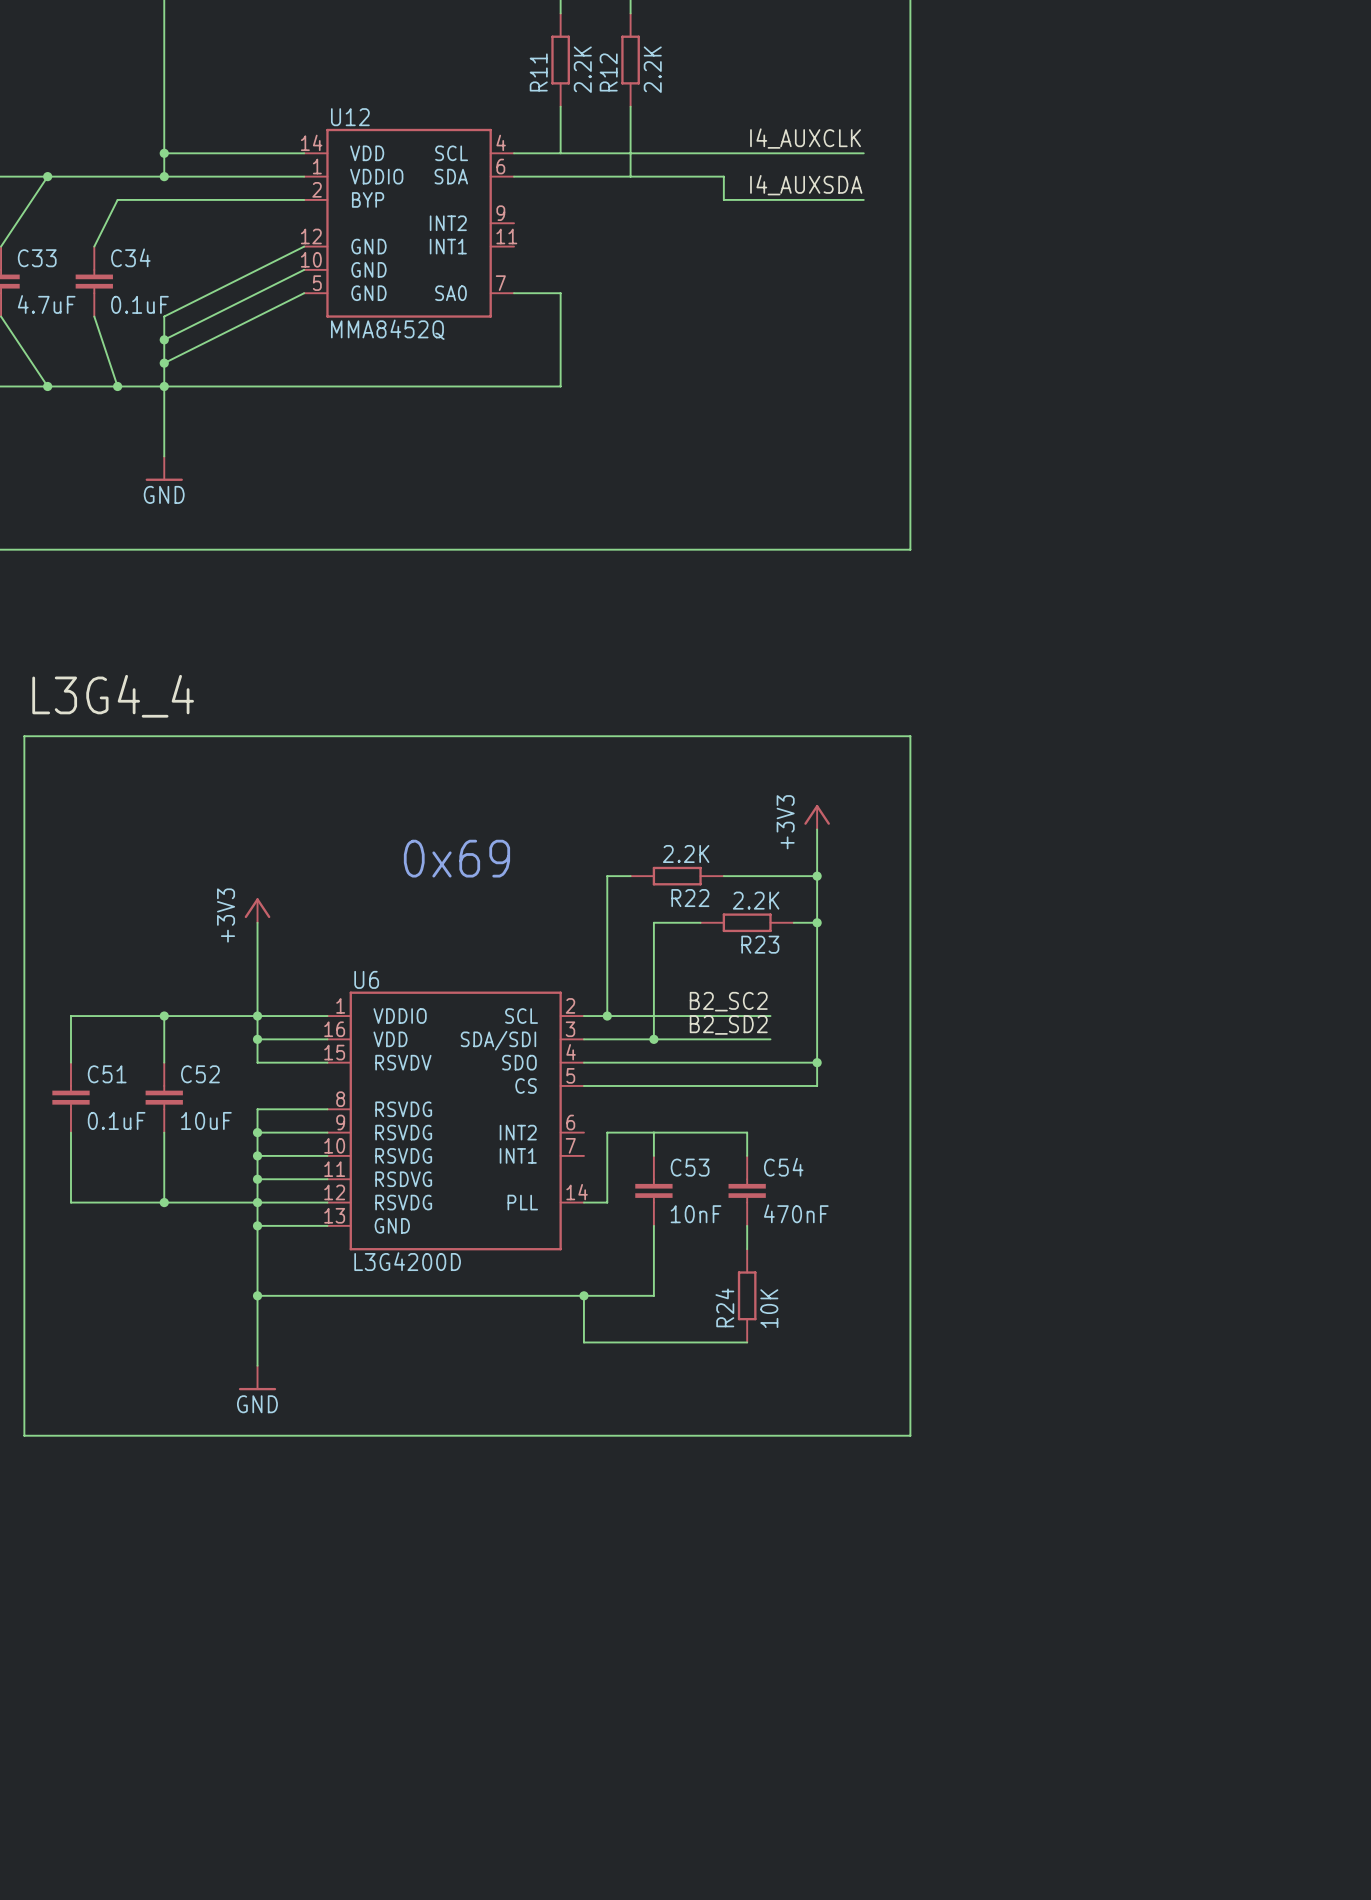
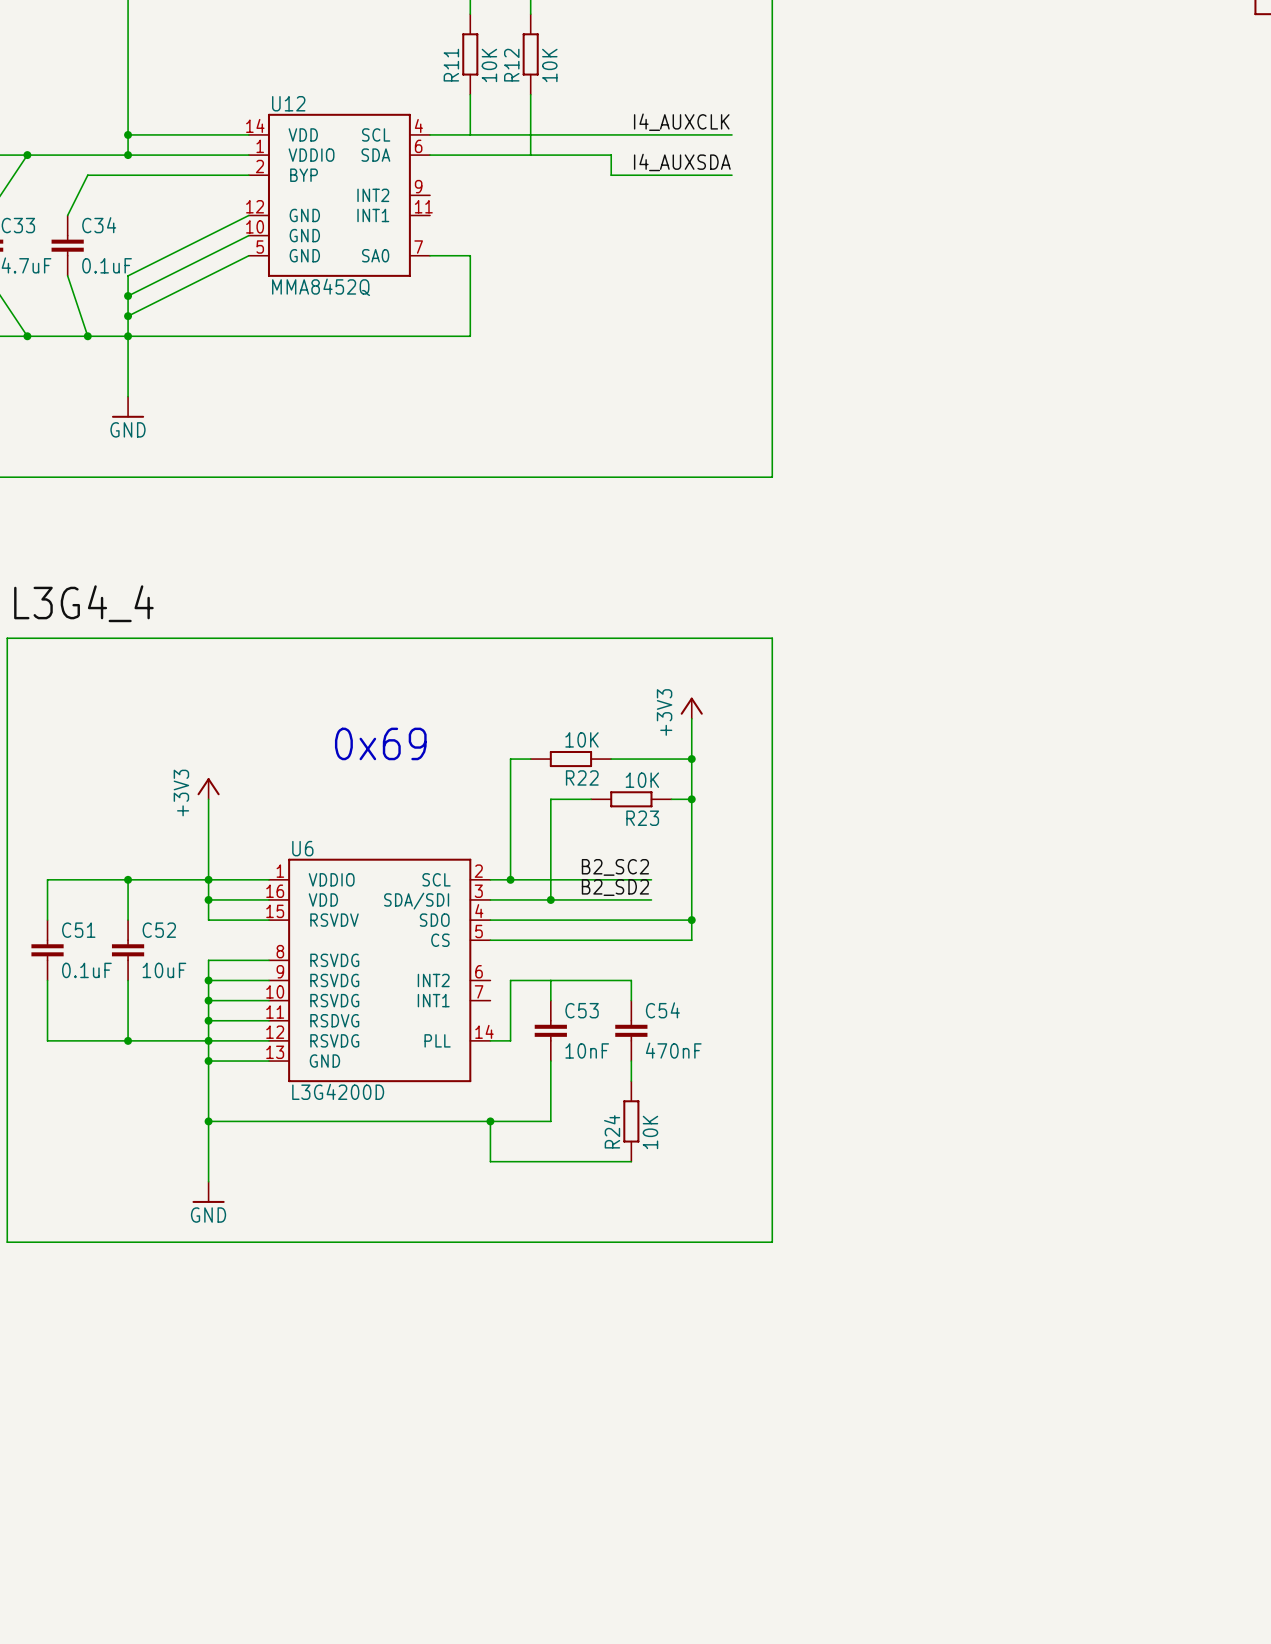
R11 value: 2.2K (582, 69) -> 10K (489, 65)
R12 value: 2.2K (652, 69) -> 10K (549, 65)
R22 value: 2.2K (686, 853) -> 10K (581, 739)
R23 value: 2.2K (756, 900) -> 10K (642, 780)

